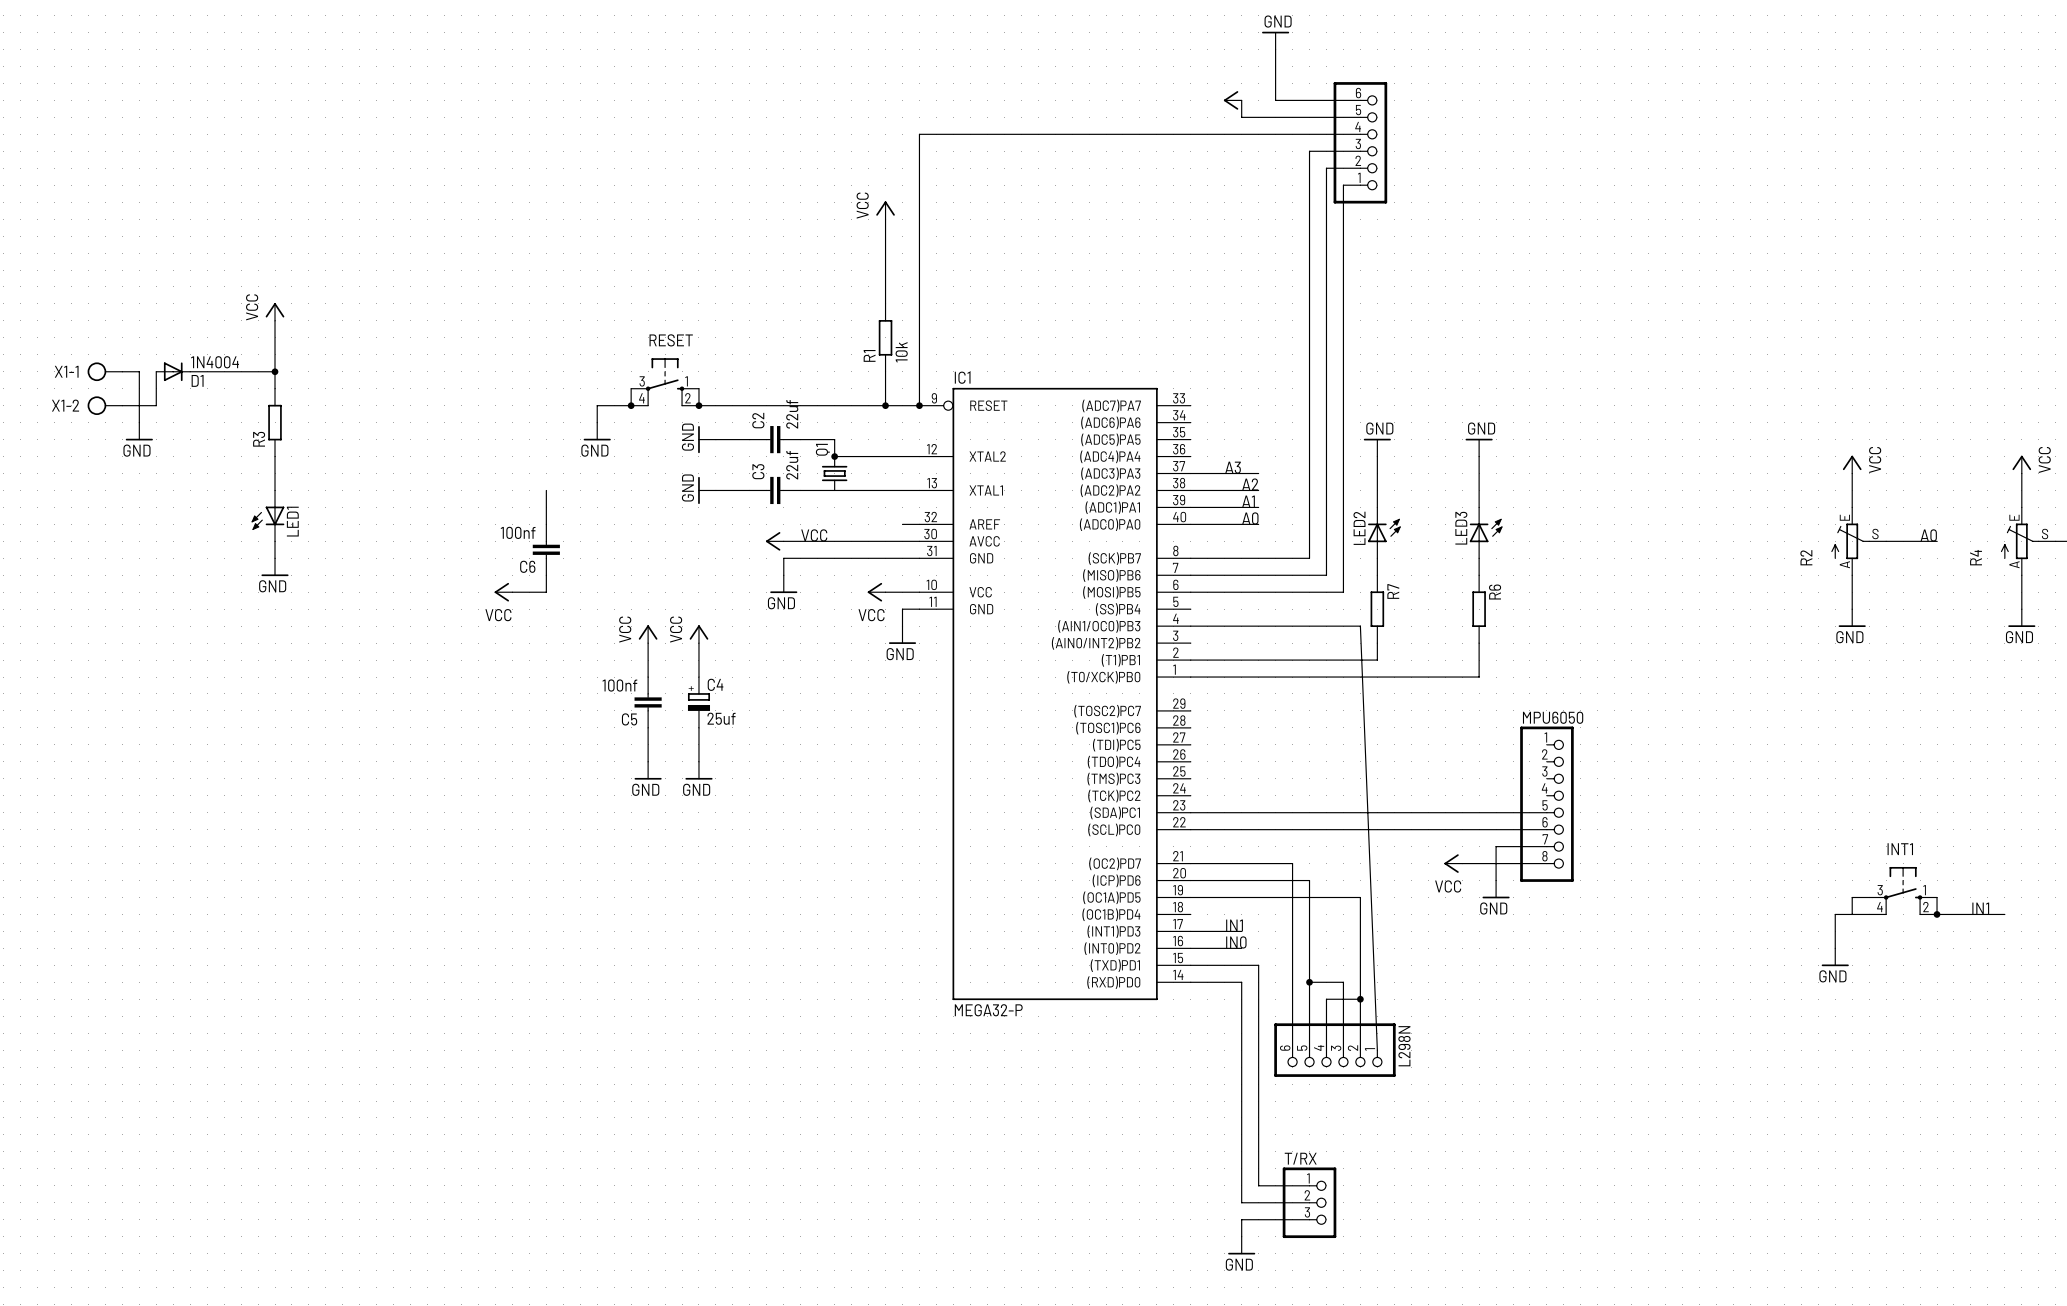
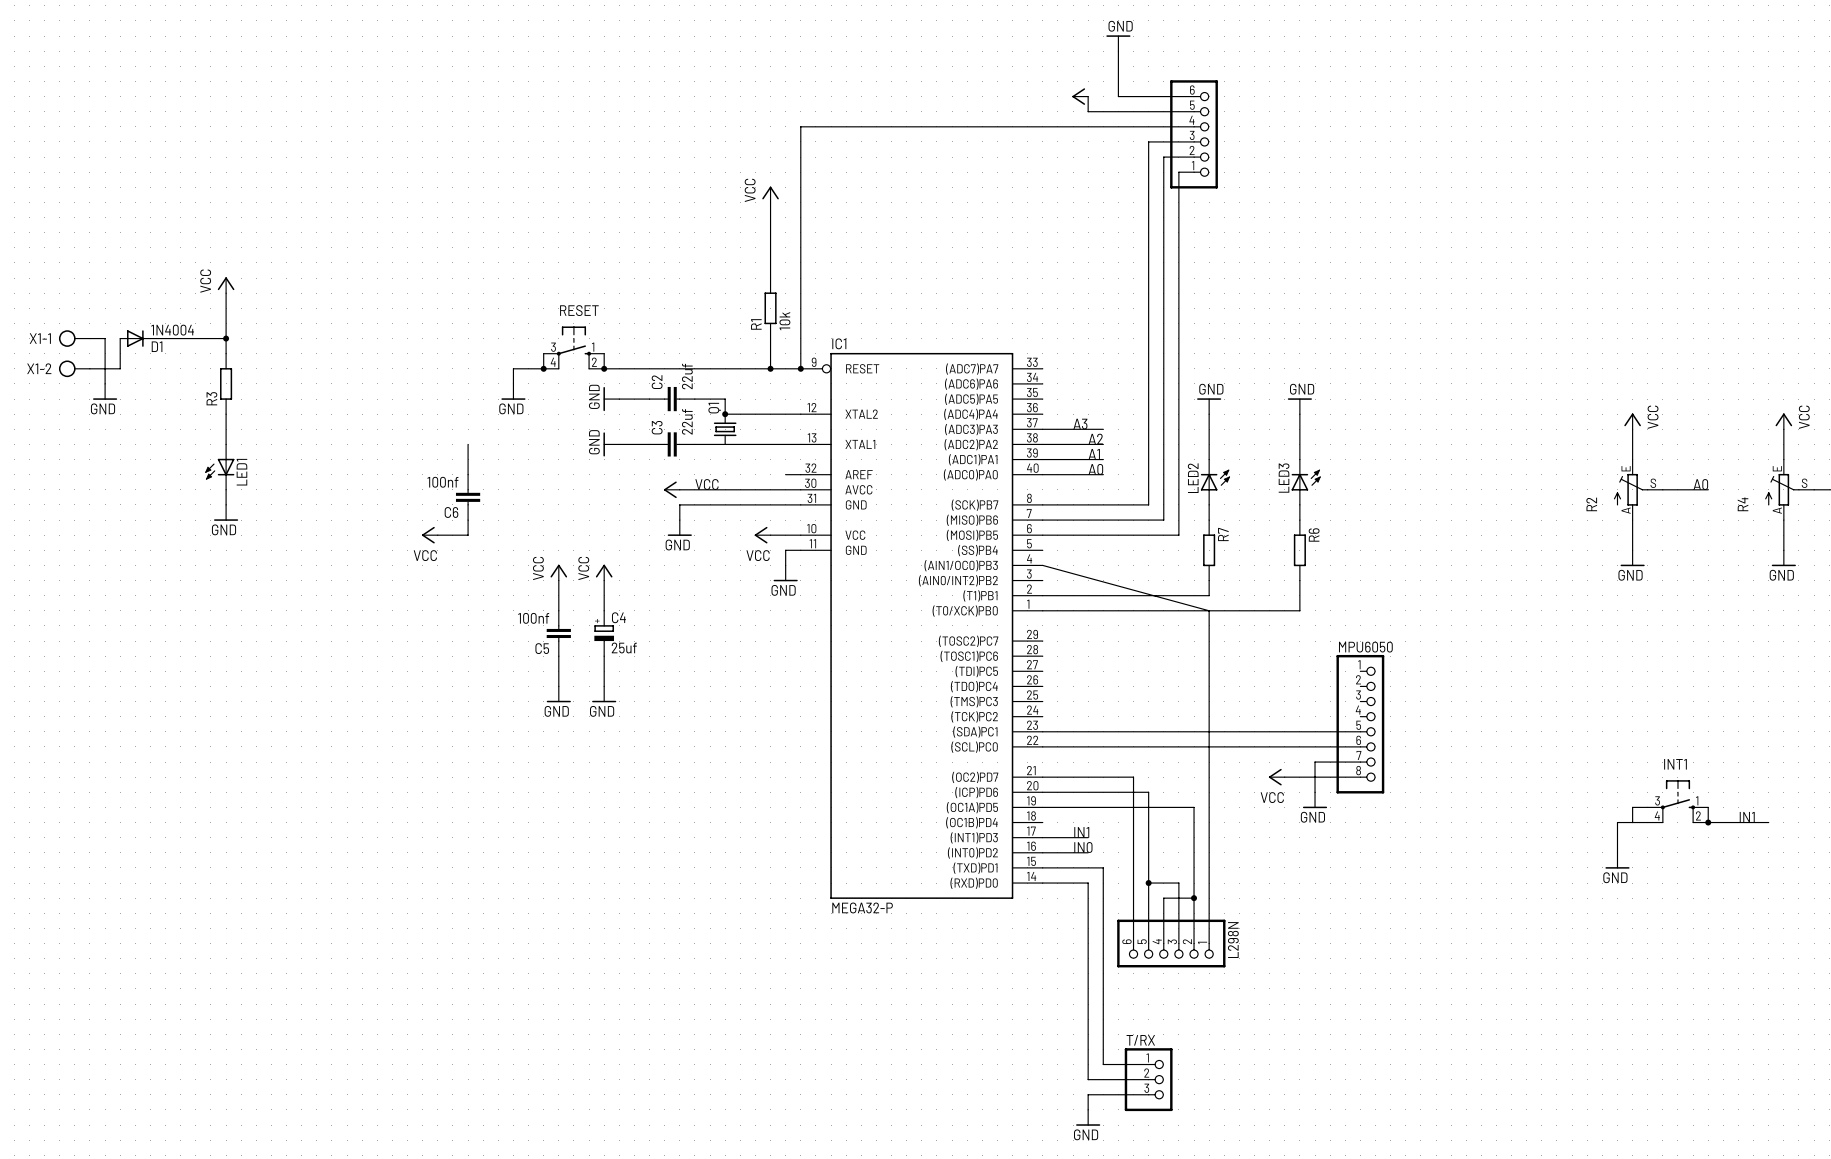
wire: (1190, 626) (1360, 626) (1377, 1050) -> (1042, 565) (1209, 610) (1209, 943)

